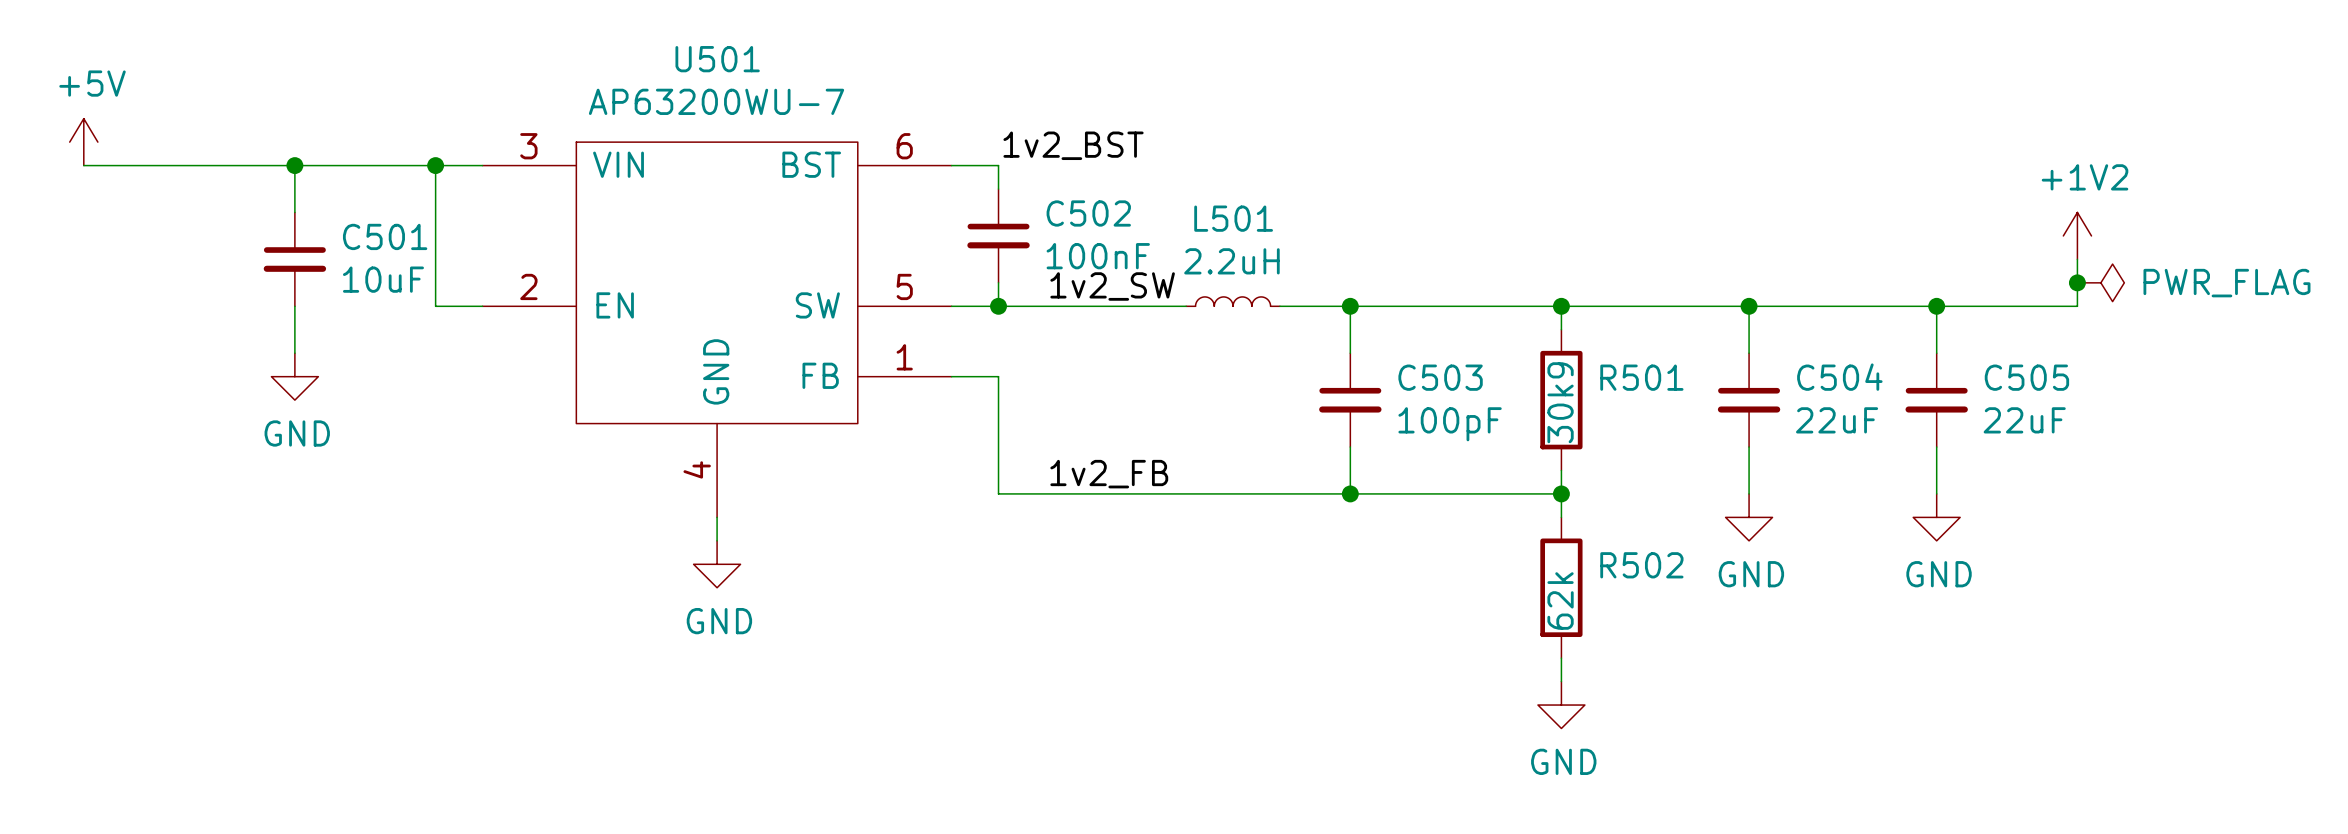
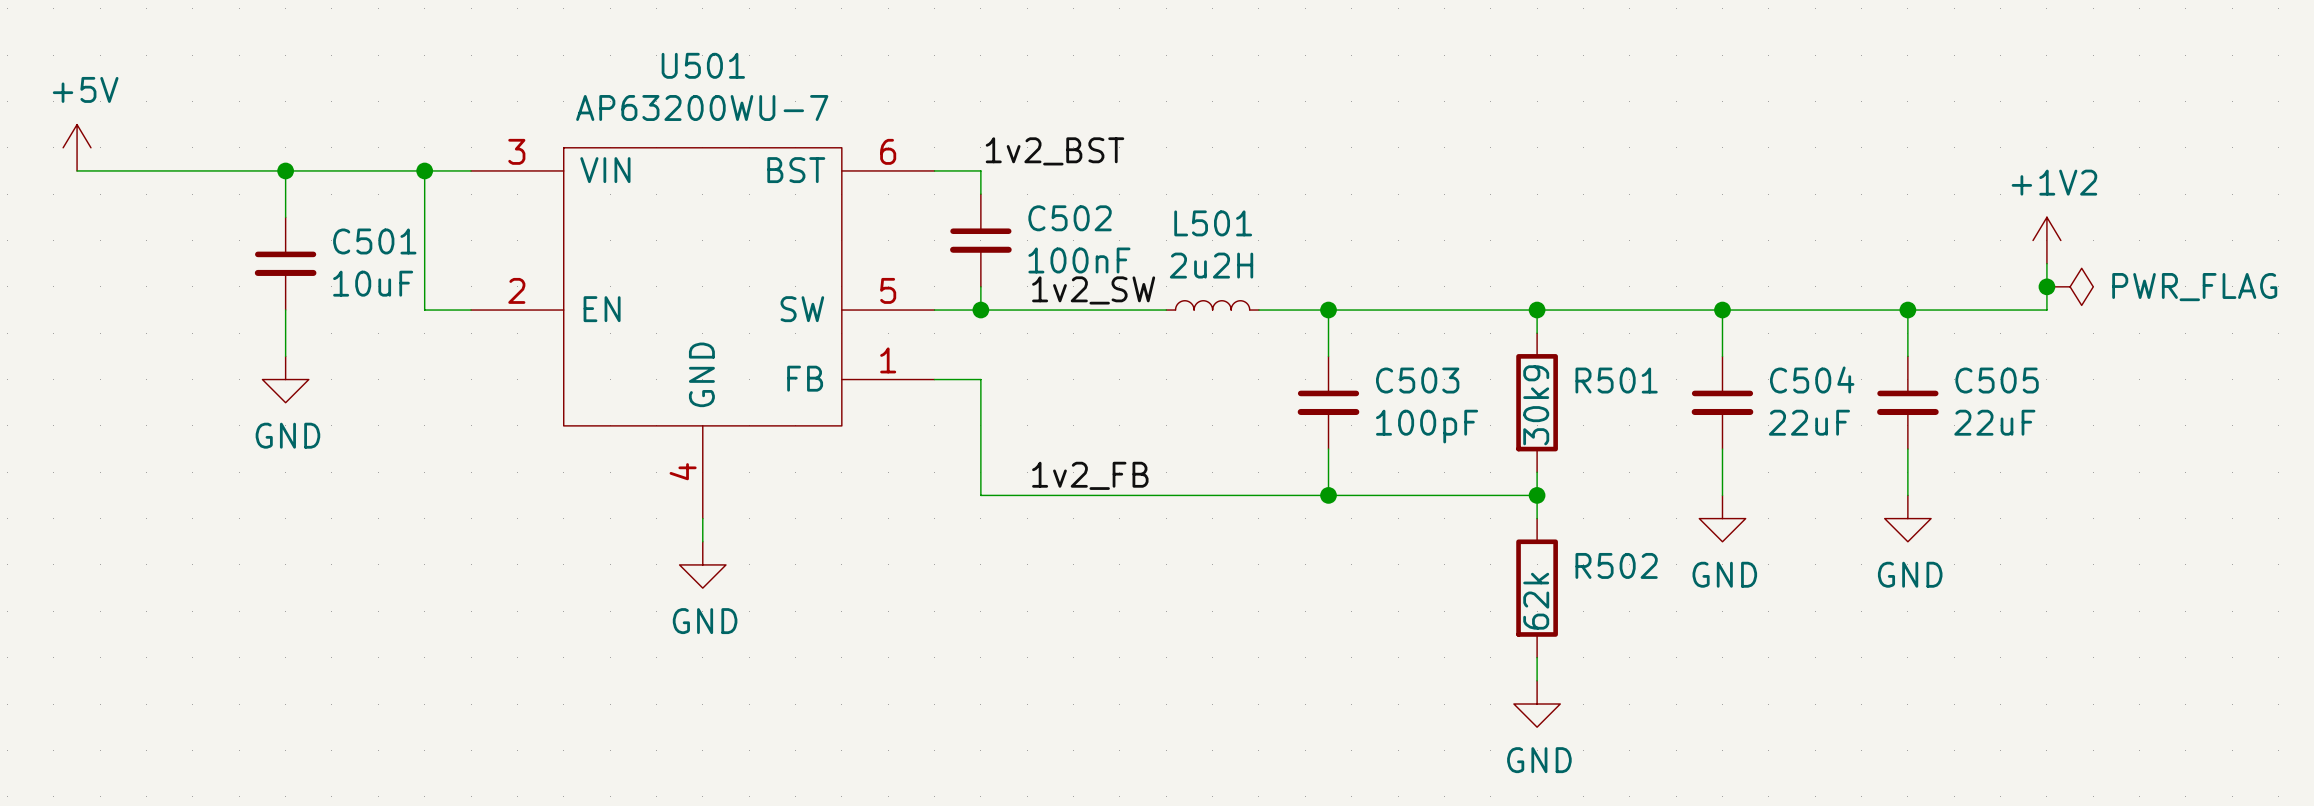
L501 value: 2.2uH (1231, 261) -> 2u2H (1211, 265)

